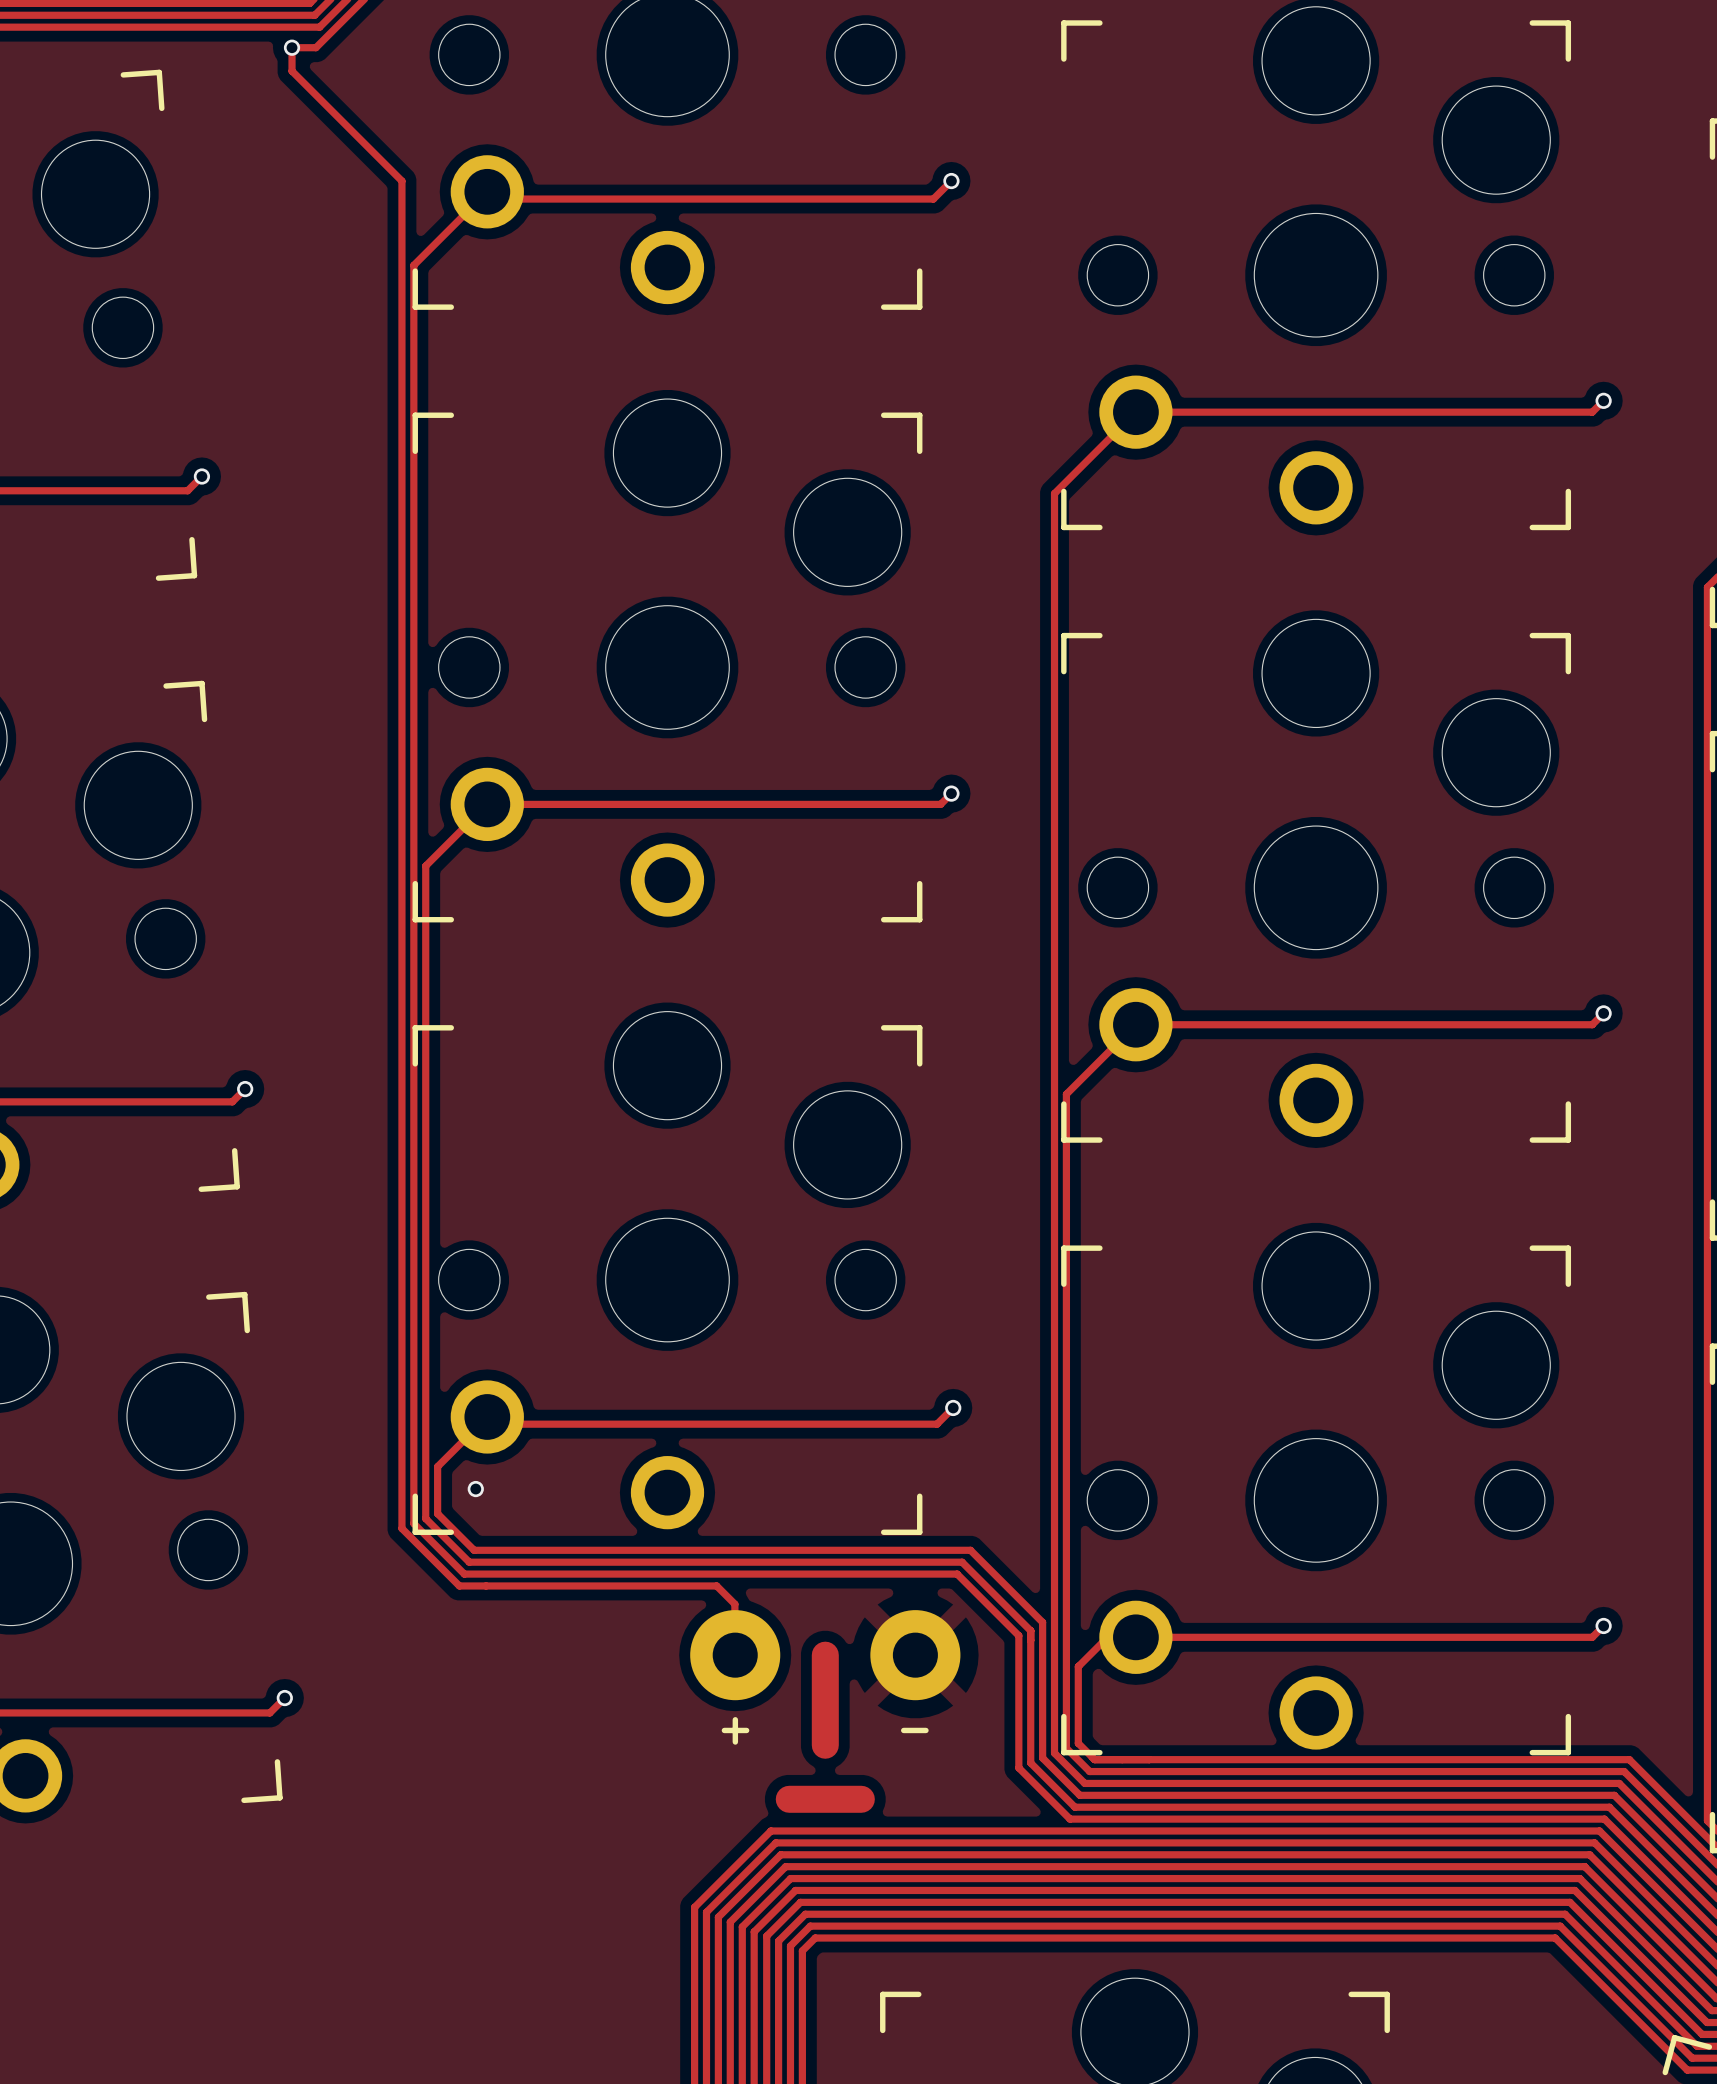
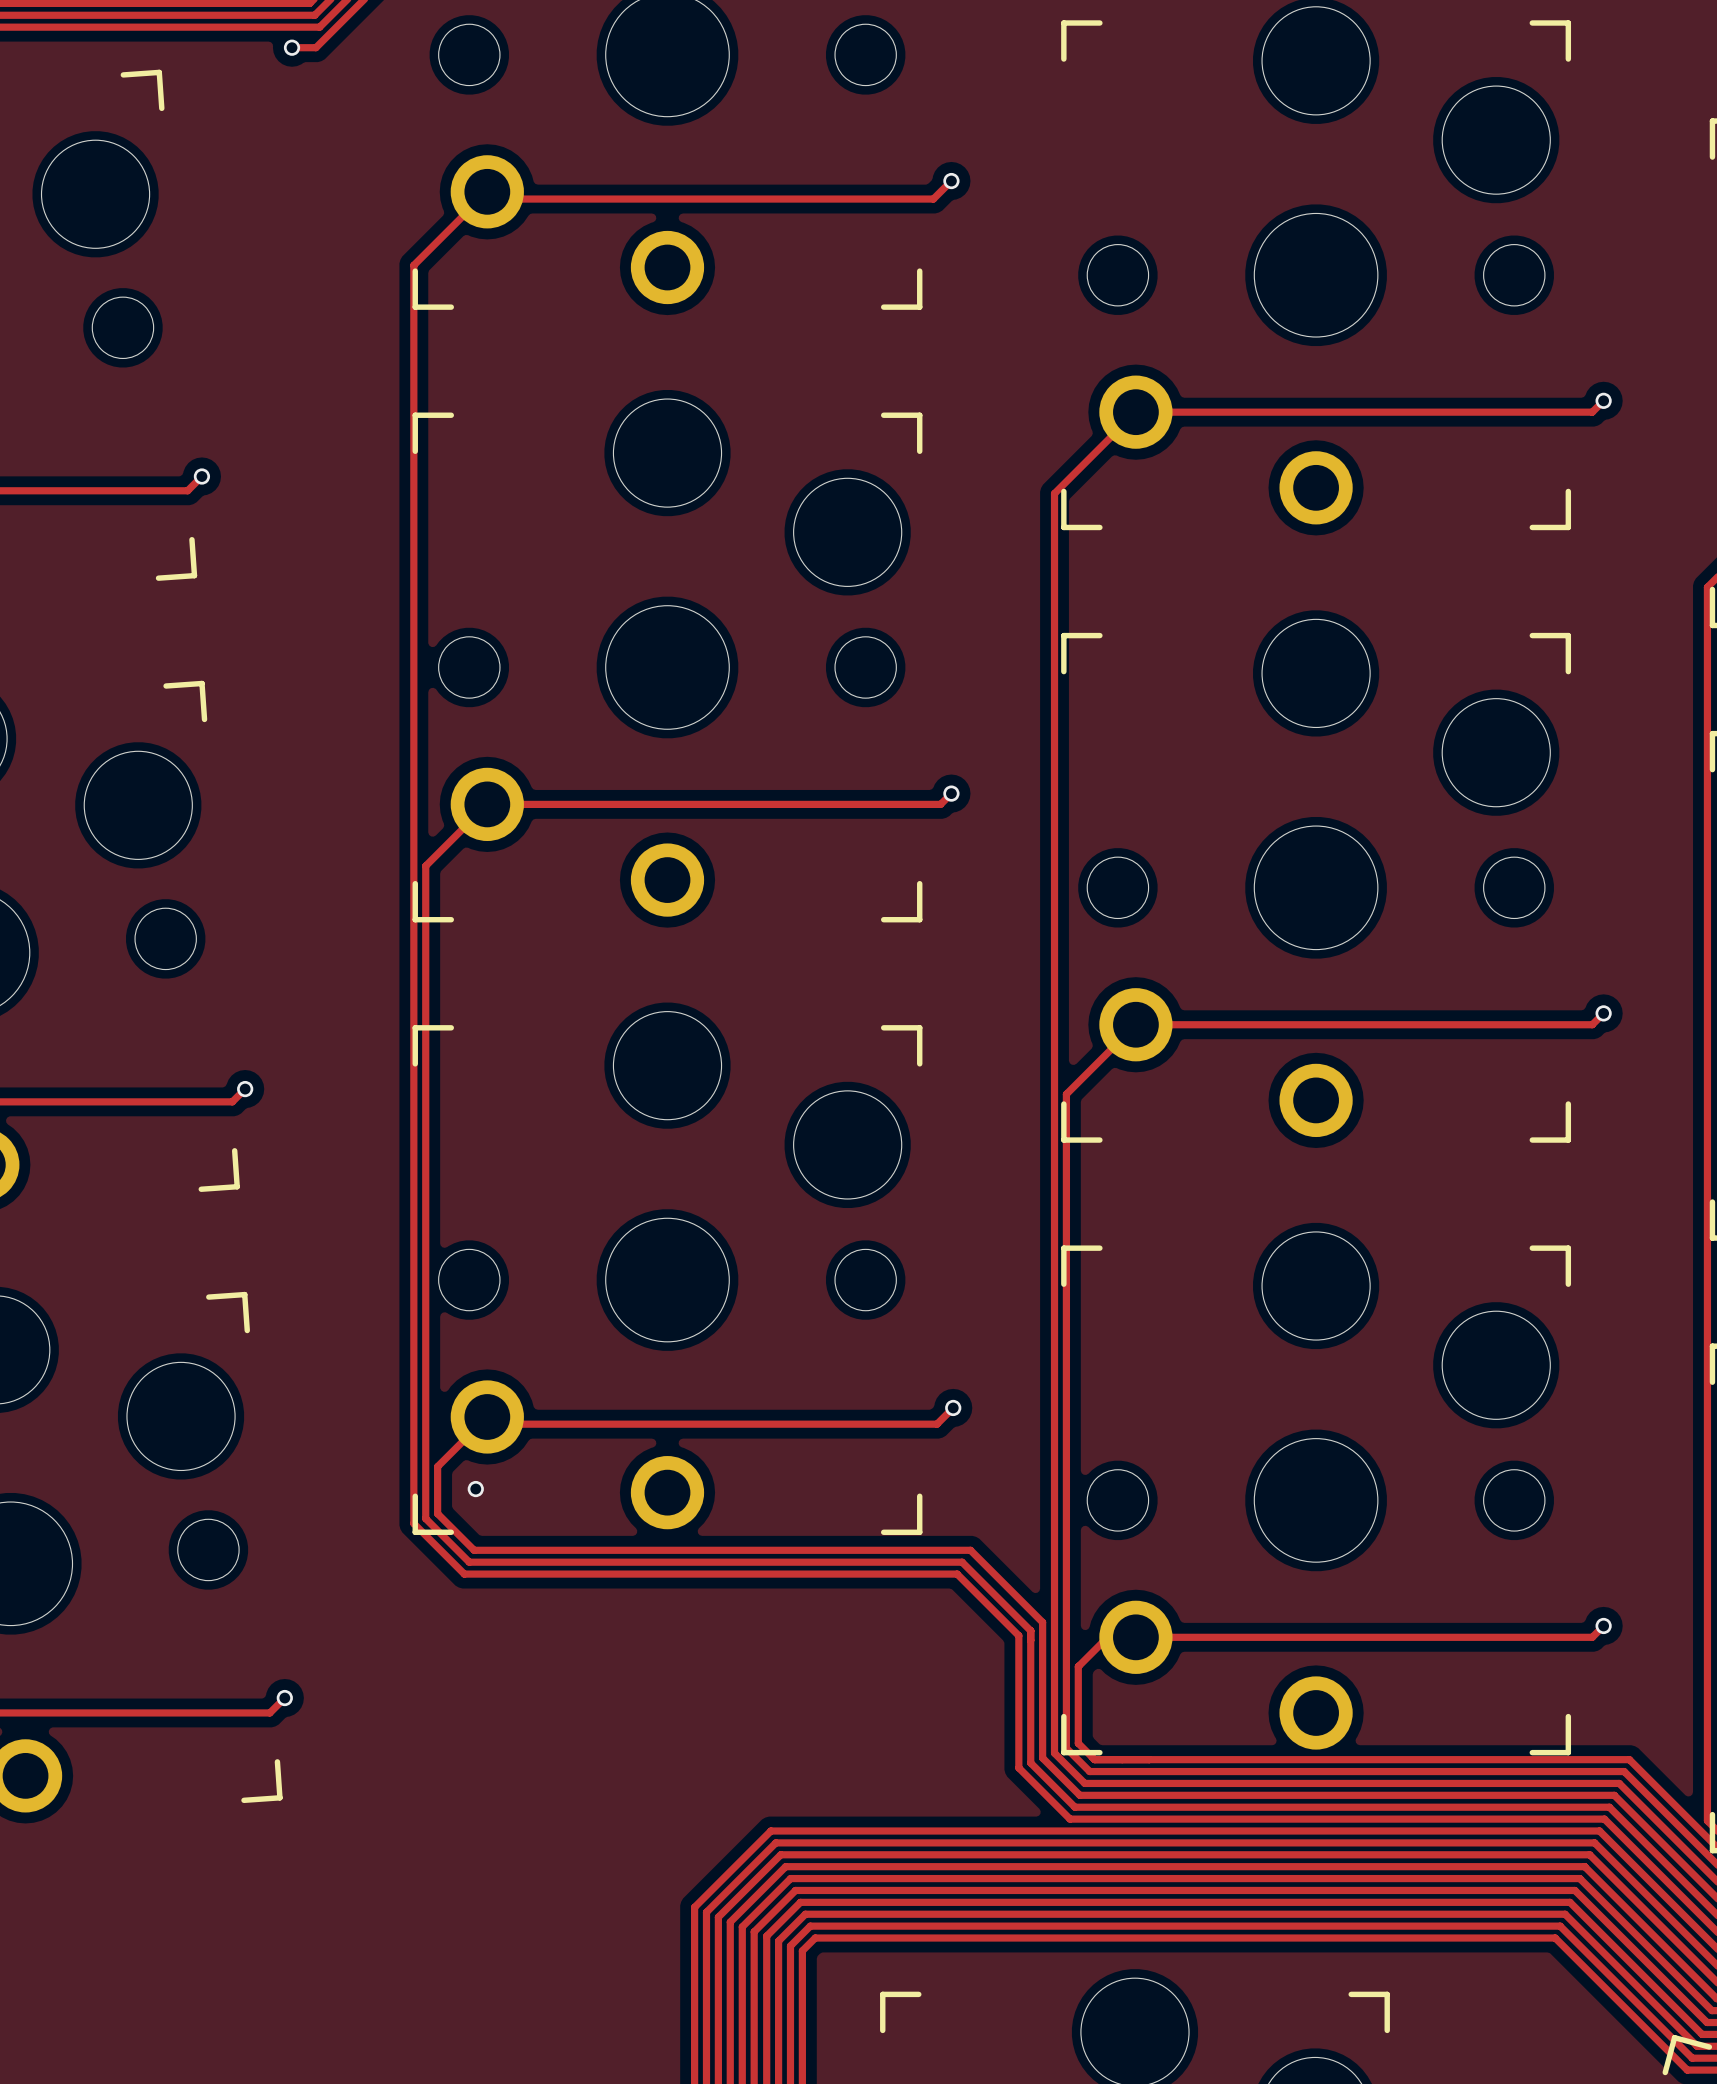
track: (292, 47) (292, 71) (401, 181) (401, 1528) (459, 1585) (716, 1585) (734, 1604) (734, 1655) -> none
part: (735, 1655) -> none
track: (825, 1655) (825, 1745) -> none
part: (915, 1655) -> none
line: (735, 1719) (735, 1742) -> none
line: (724, 1730) (746, 1730) -> none
line: (903, 1730) (925, 1730) -> none
track: (789, 1799) (861, 1799) -> none

